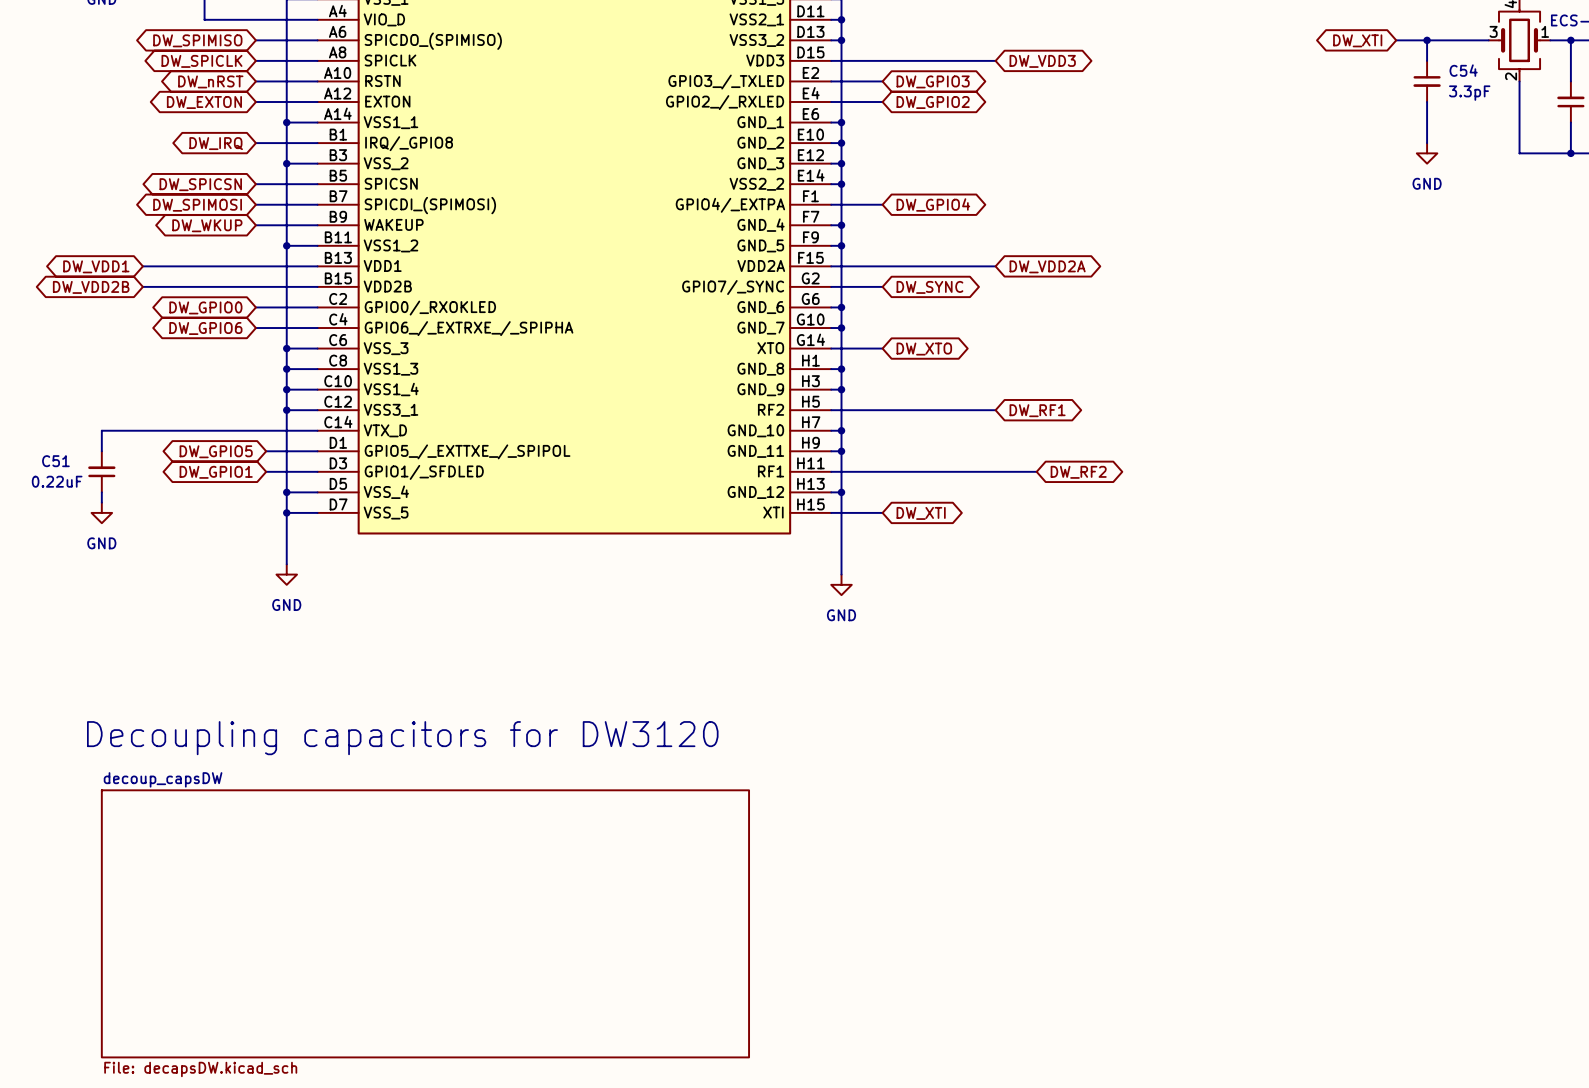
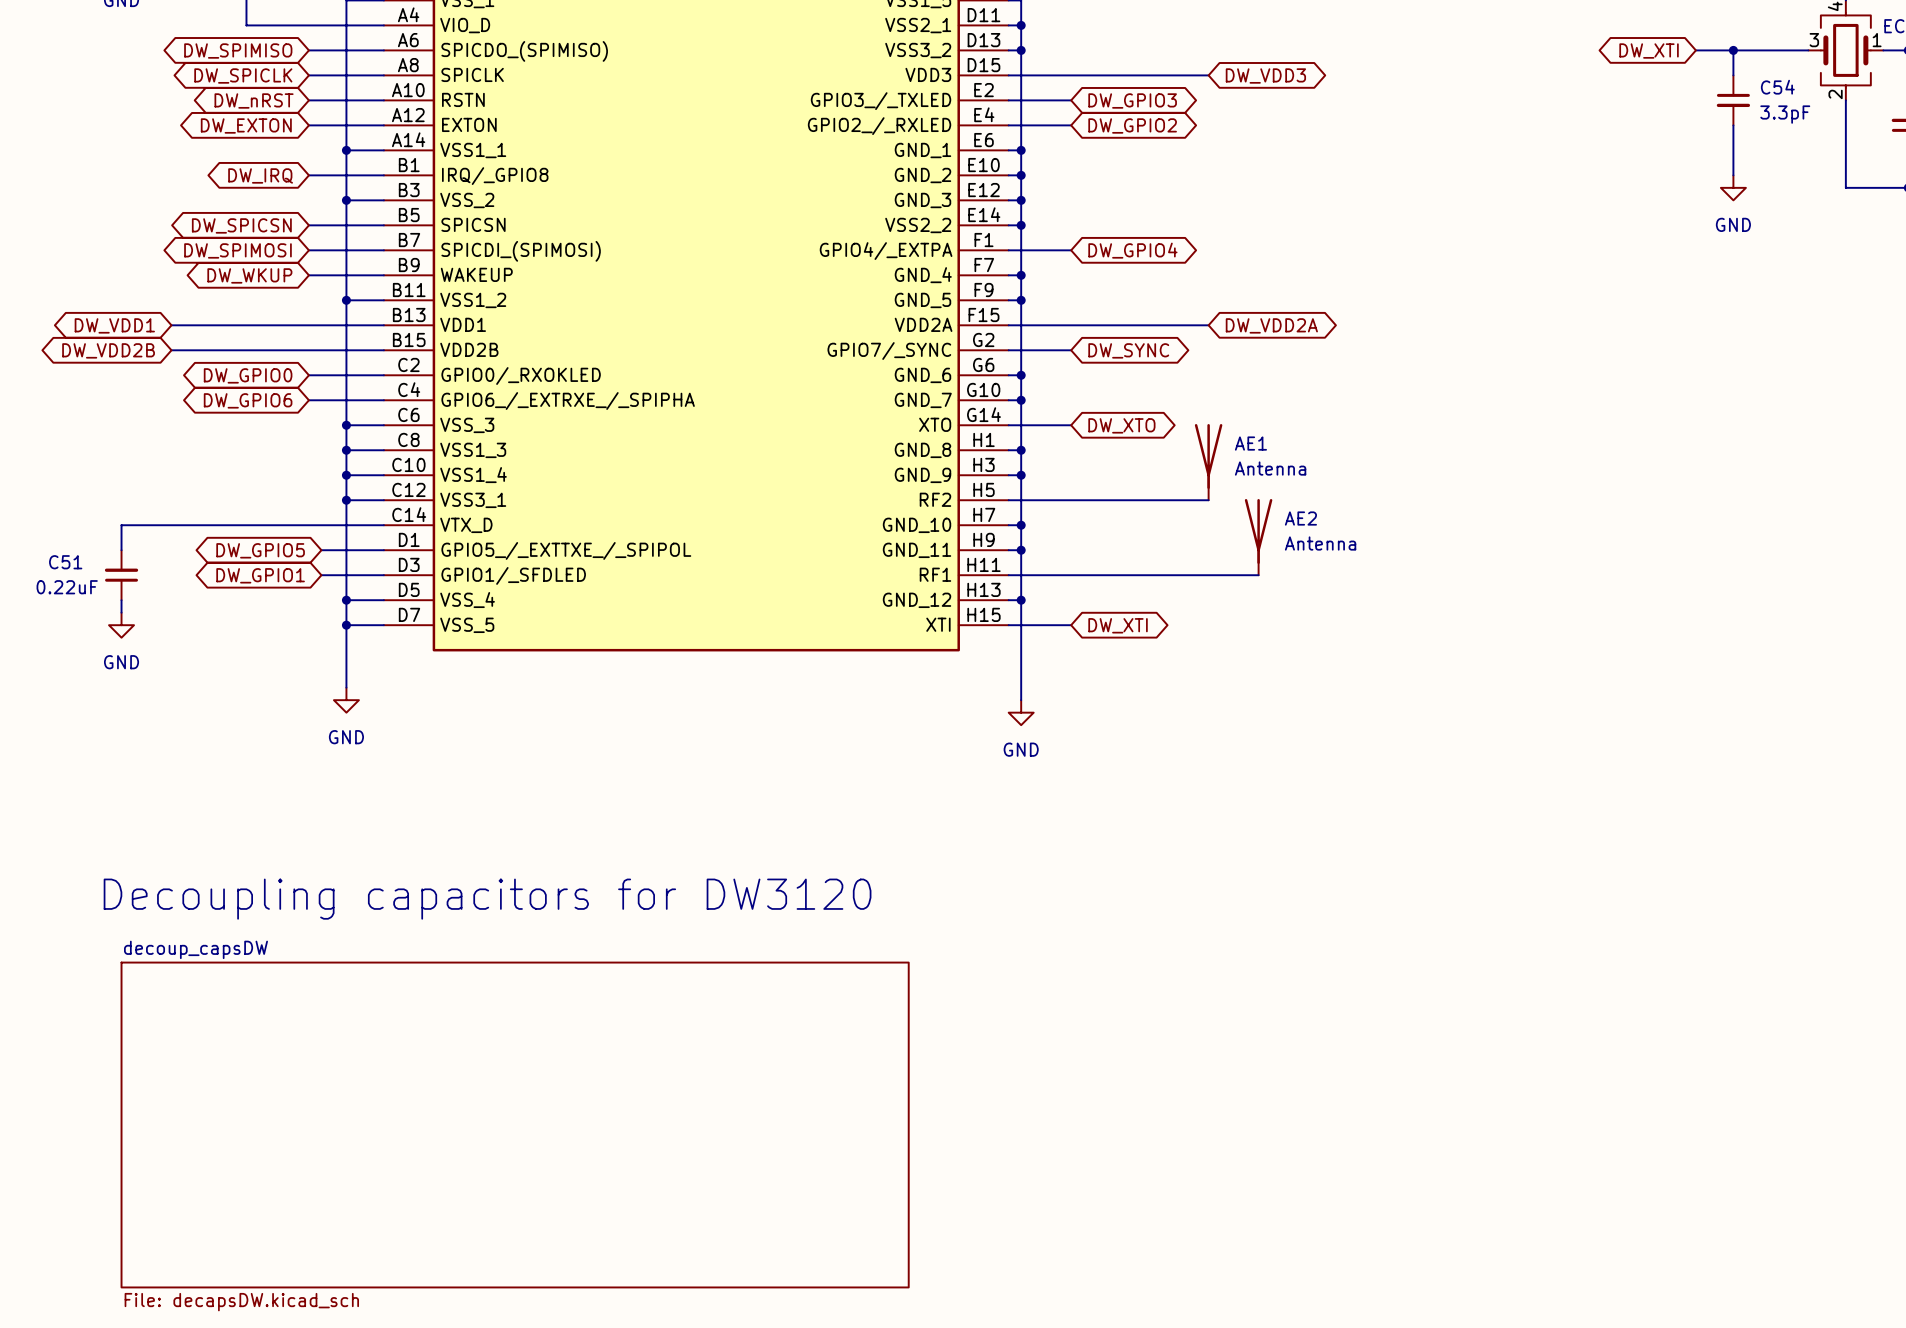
AE1: none -> Antenna (1208, 462)
global label: DW_RF1 (1037, 410) -> none
AE2: none -> Antenna (1258, 537)
global label: DW_RF2 (1078, 472) -> none

